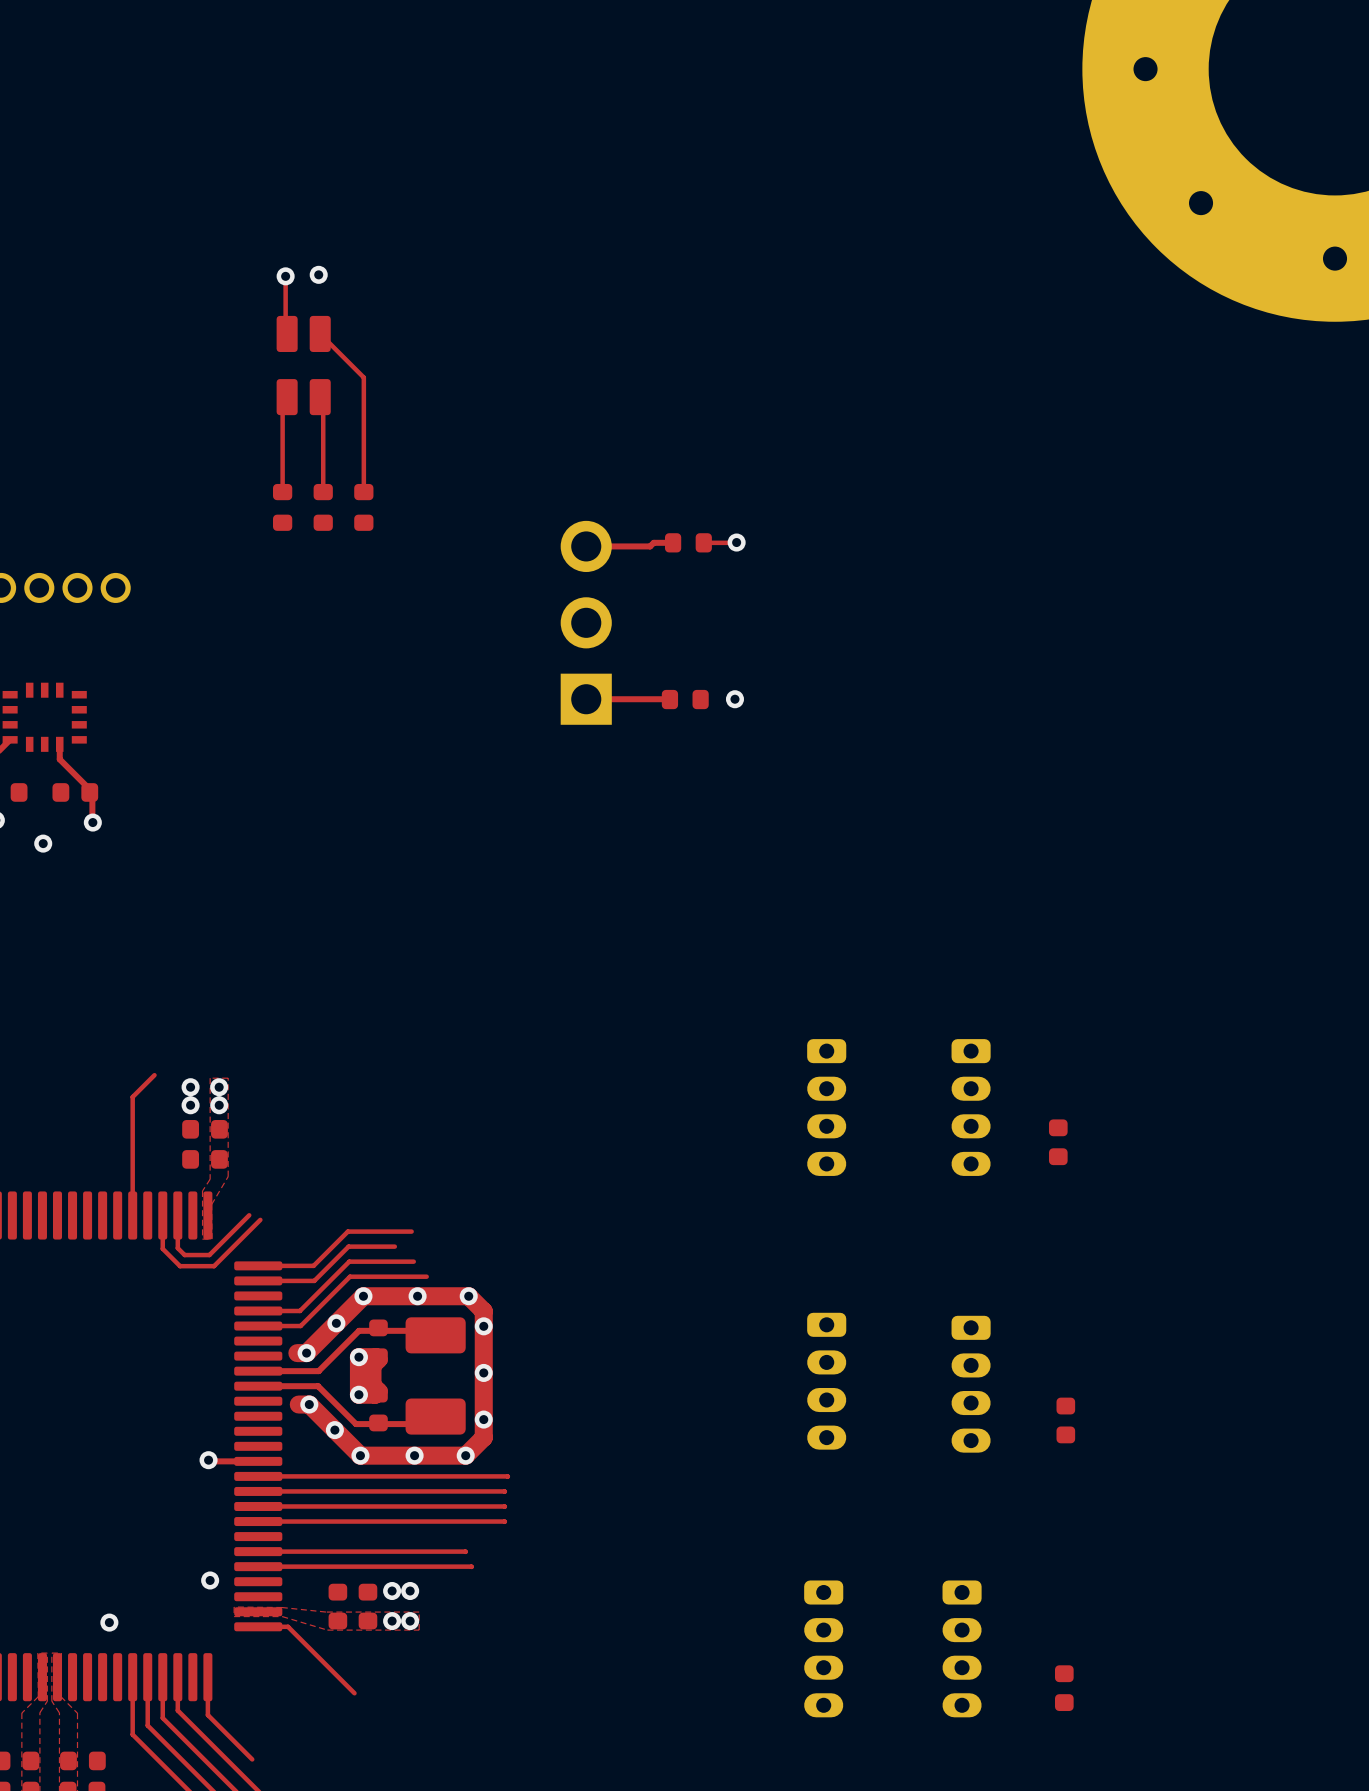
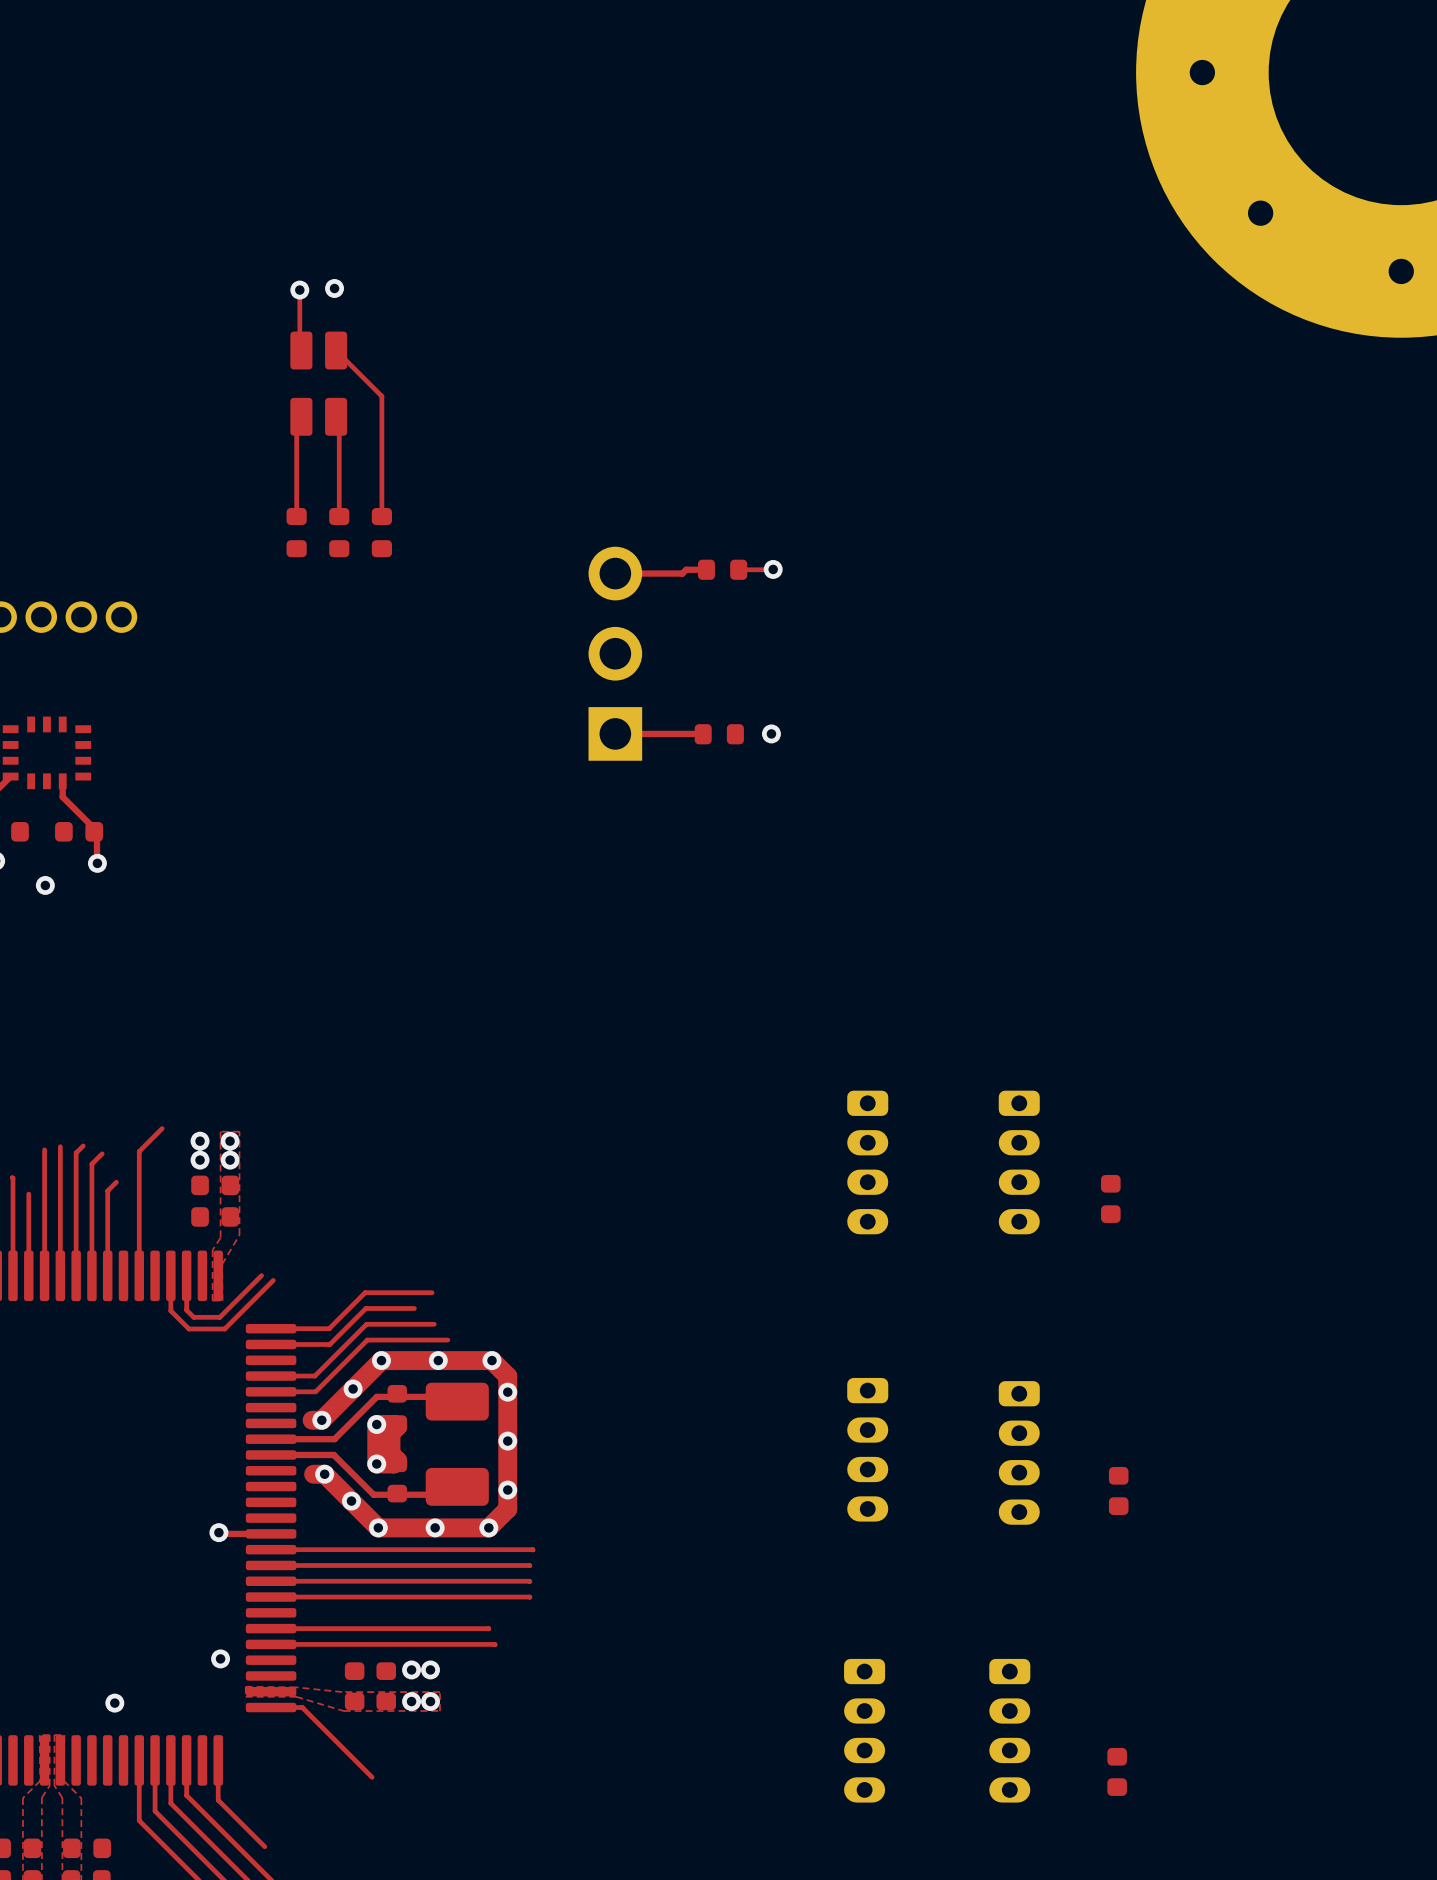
top track: none -> (83, 1145) (76, 1153) (76, 1275)
top track: none -> (60, 1146) (60, 1275)
top track: none -> (44, 1149) (44, 1275)
top track: none -> (102, 1153) (91, 1164) (91, 1275)
top track: none -> (12, 1177) (13, 1275)
top track: none -> (116, 1182) (107, 1190) (107, 1275)
top track: none -> (28, 1194) (28, 1275)

